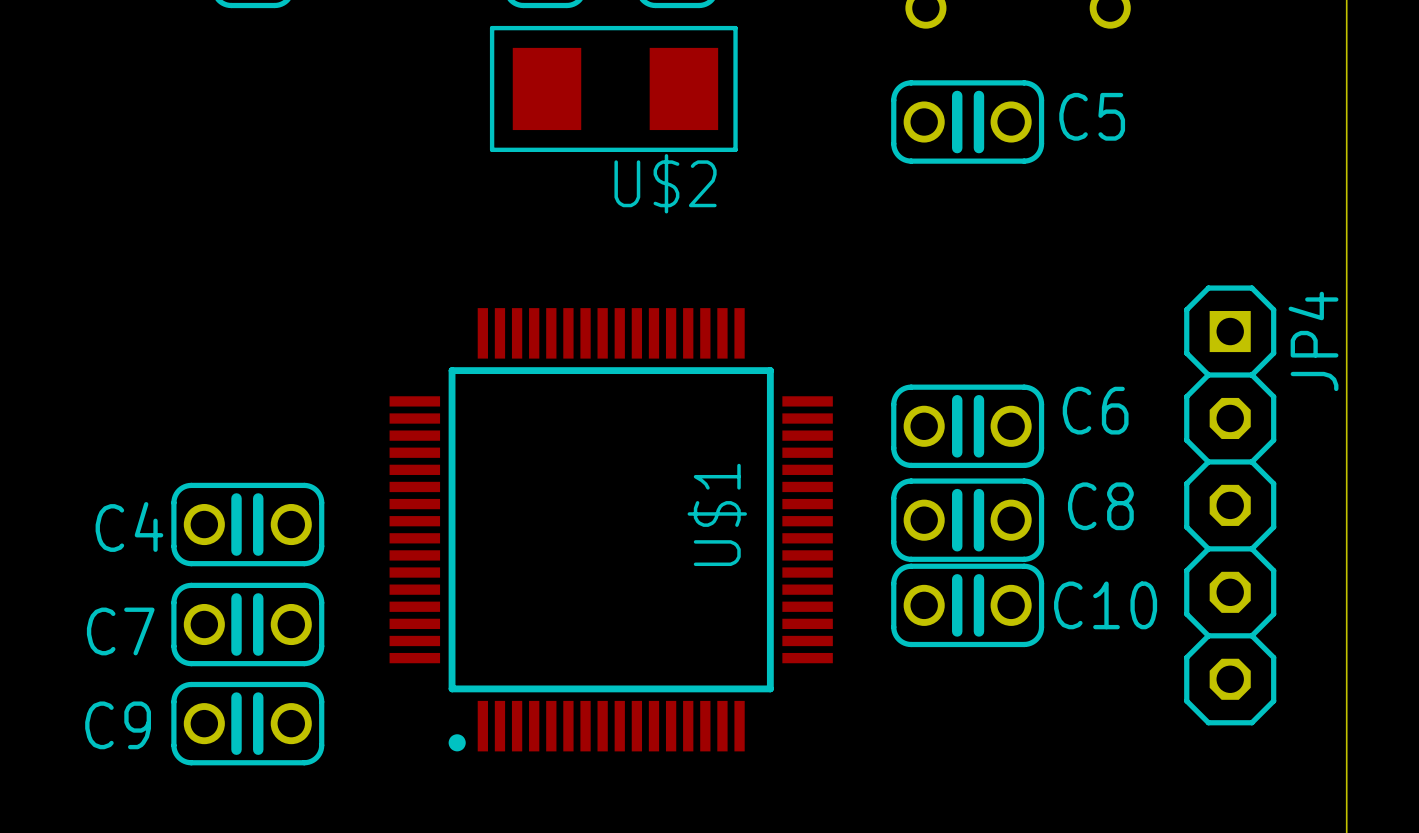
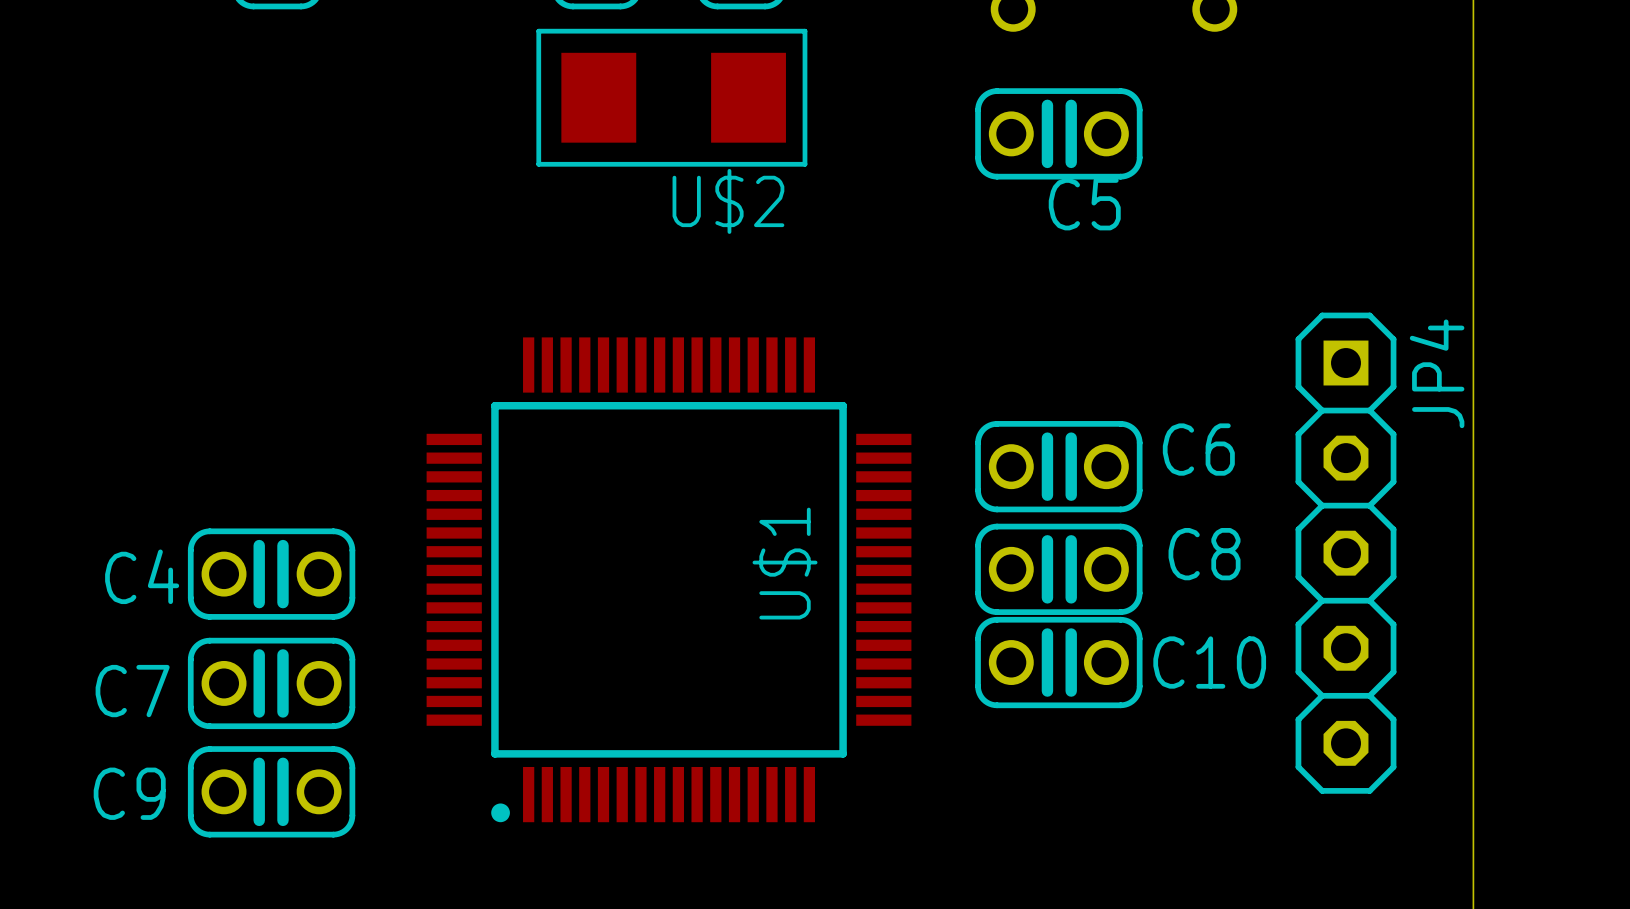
C5 name position: C5 (1092, 116) -> C5 (1084, 204)

